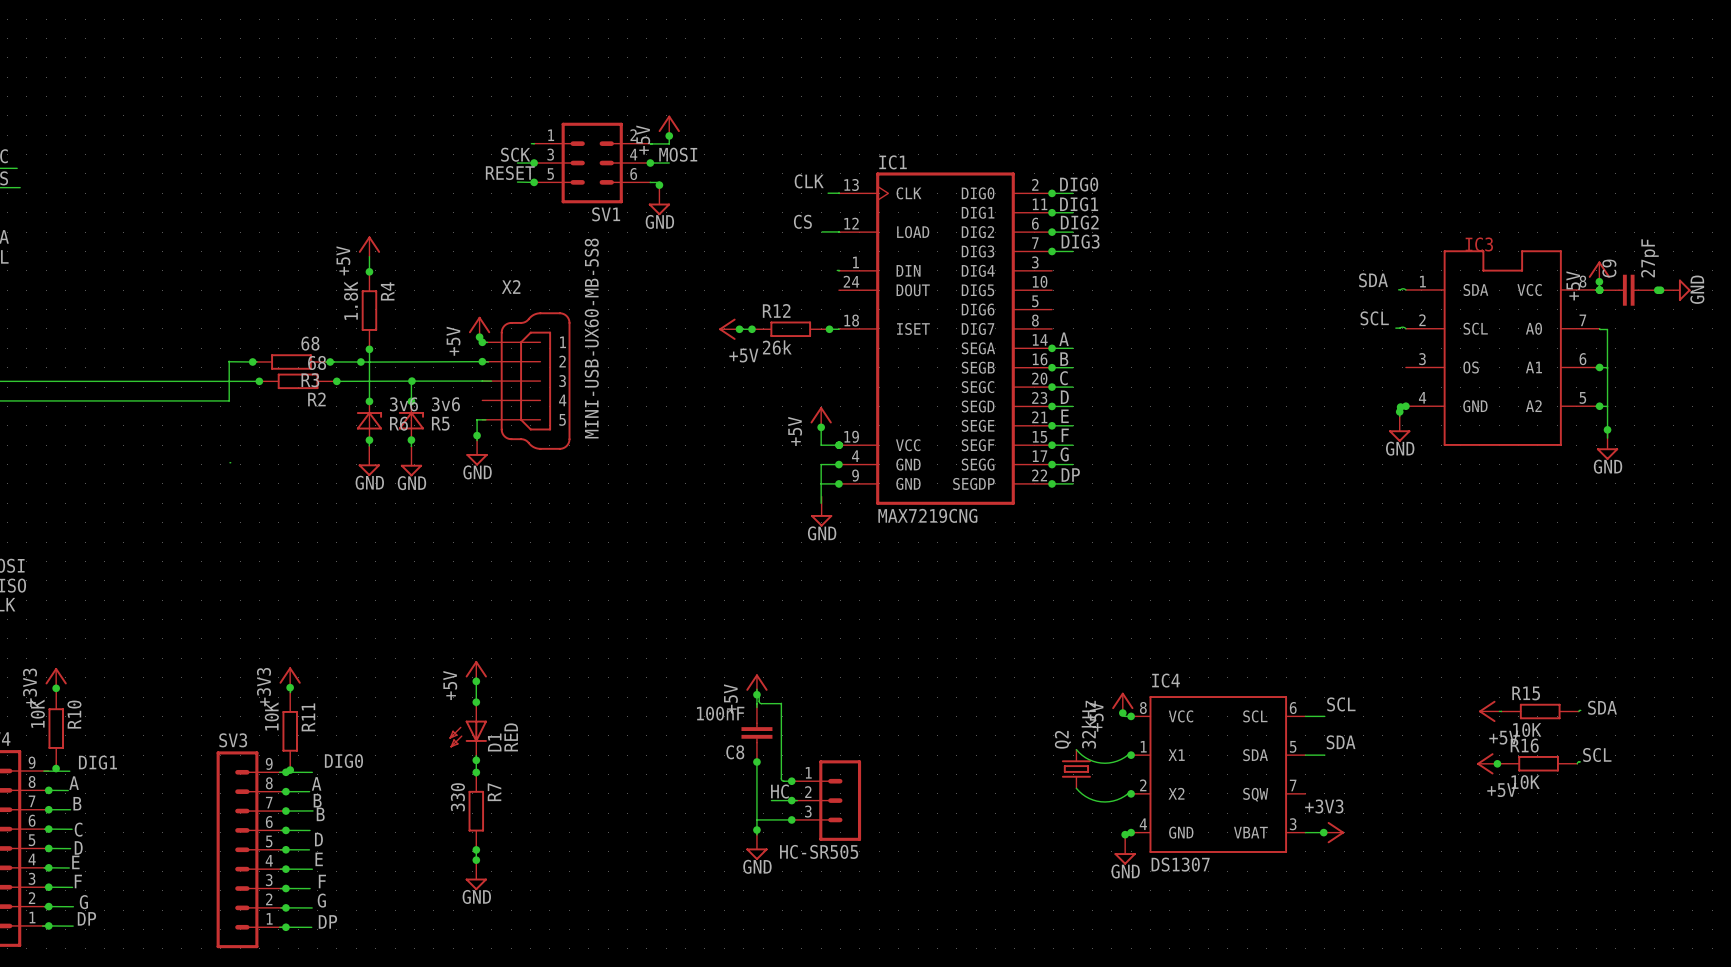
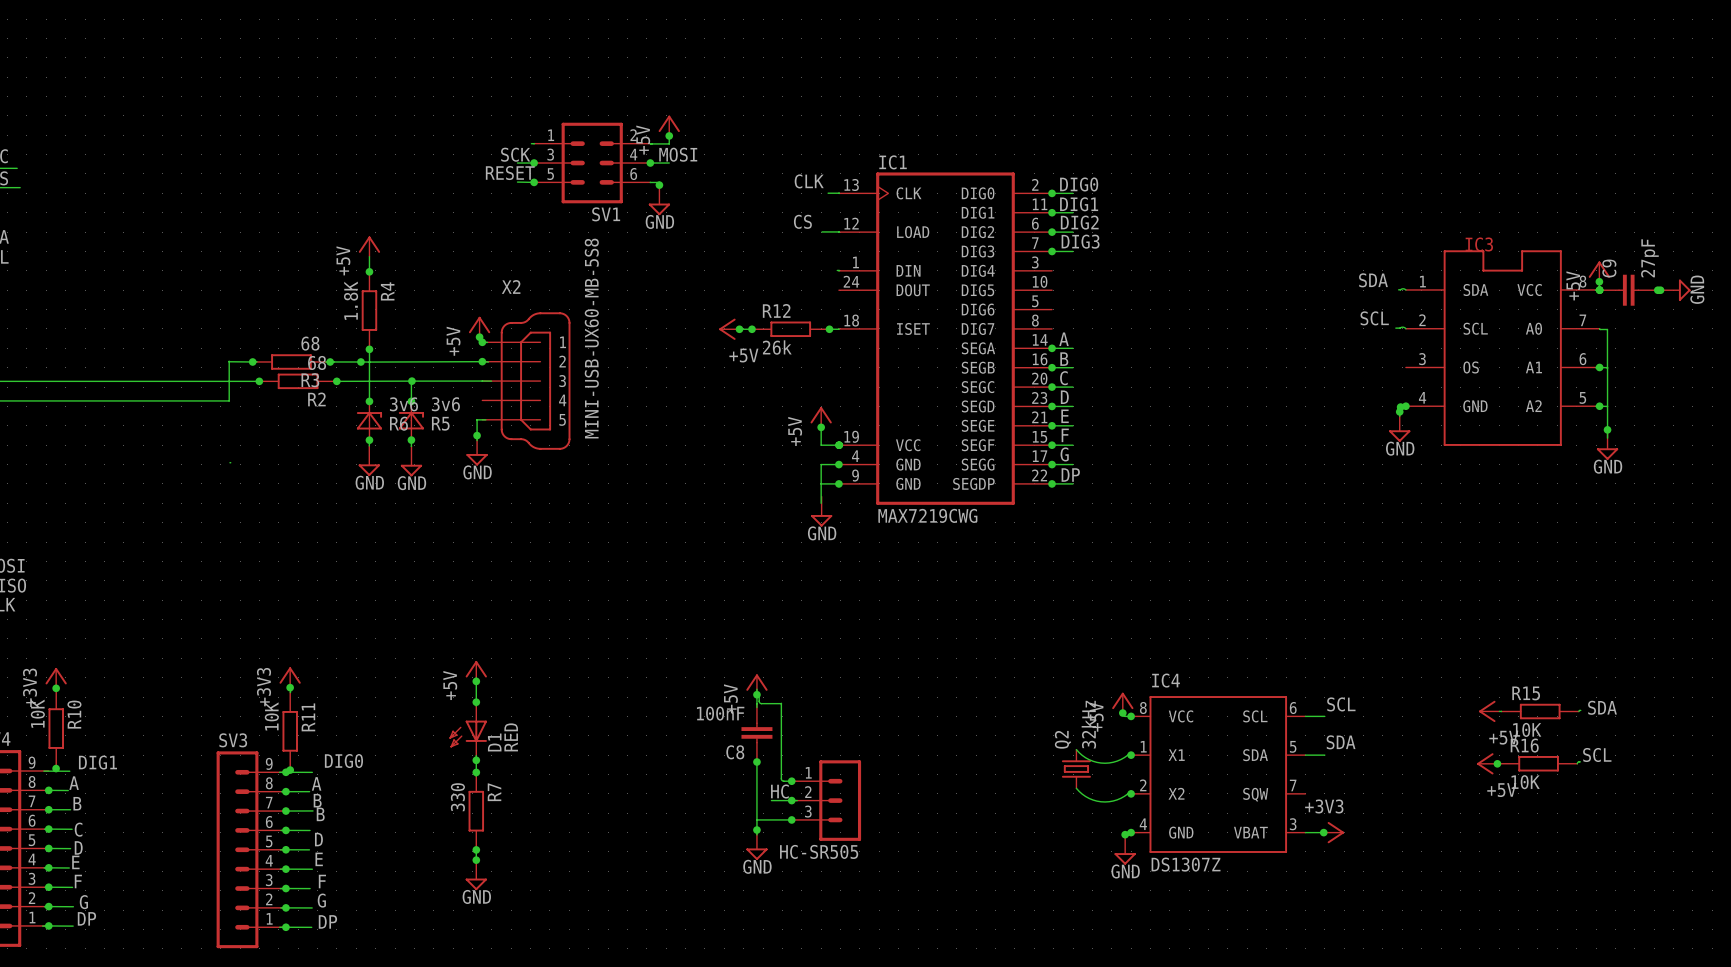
IC1 value: MAX7219CNG (927, 515) -> MAX7219CWG (927, 515)
IC4 value: DS1307 (1180, 864) -> DS1307Z (1186, 864)

